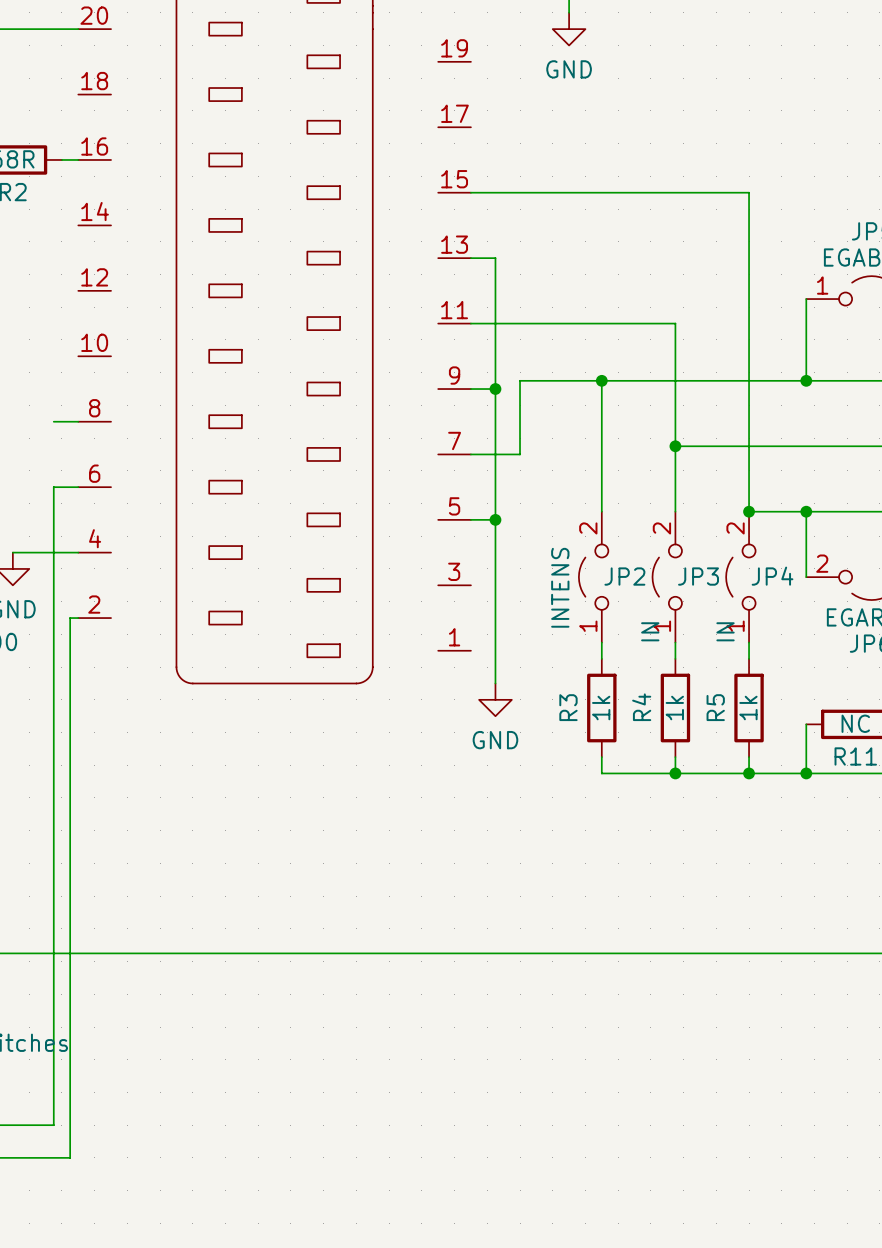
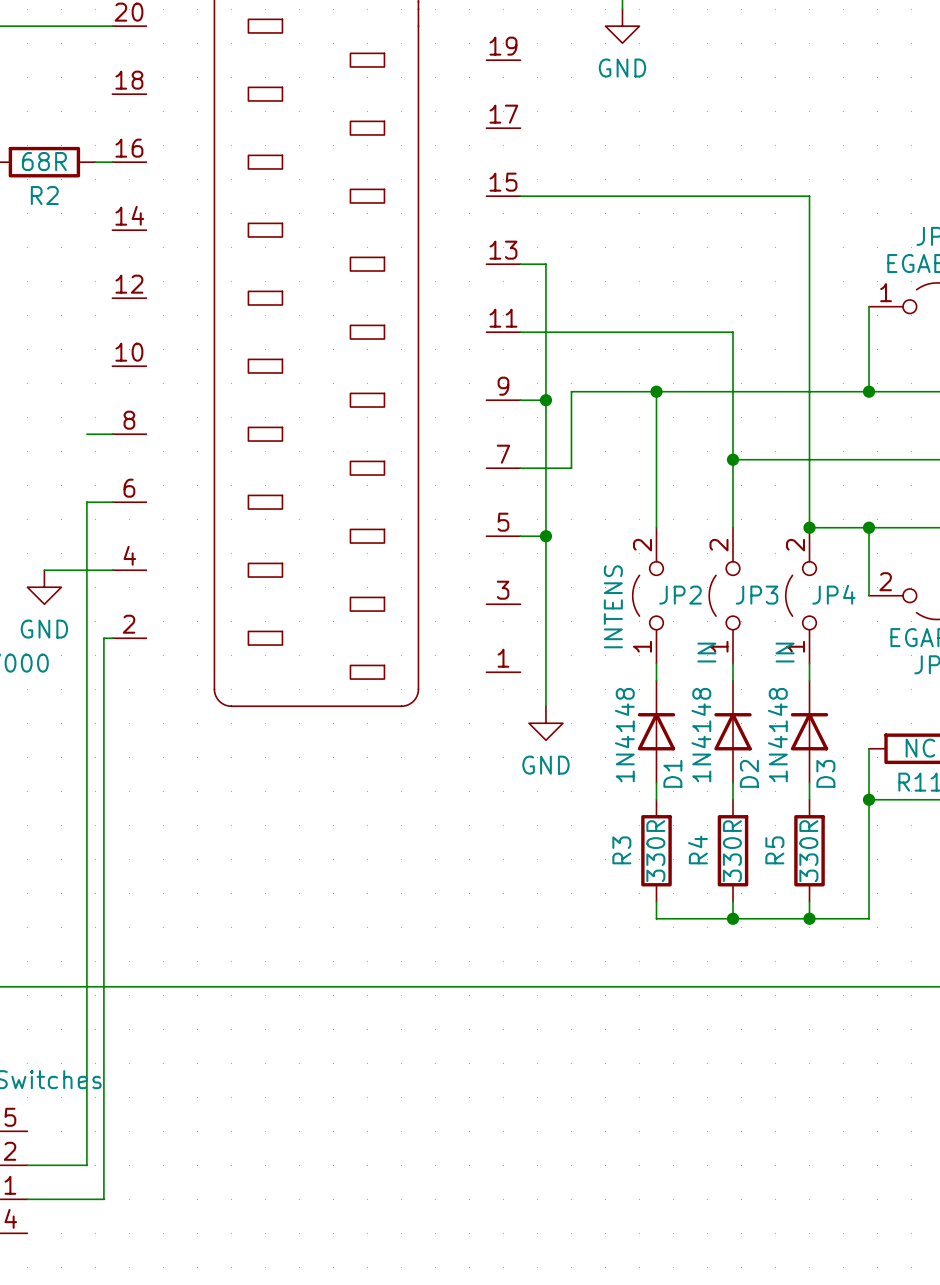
R3 position: (601, 708) -> (656, 850)
R3 value: 1k (601, 708) -> 330R (655, 851)
D1: none -> 1N4148 (656, 731)
R4 value: 1k (674, 708) -> 330R (732, 851)
R4 position: (675, 708) -> (733, 850)
D2: none -> 1N4148 (733, 731)
R5 value: 1k (748, 708) -> 330R (808, 851)
R5 position: (749, 708) -> (809, 850)
D3: none -> 1N4148 (809, 731)
wire: (601, 773) (806, 773) -> (656, 901) (656, 918) (869, 918) (869, 799)
junction: (675, 773) -> none
junction: (749, 773) -> none
wire: none -> (733, 901) (733, 918)
wire: none -> (809, 901) (809, 918)
junction: none -> (733, 918)
junction: none -> (809, 918)

